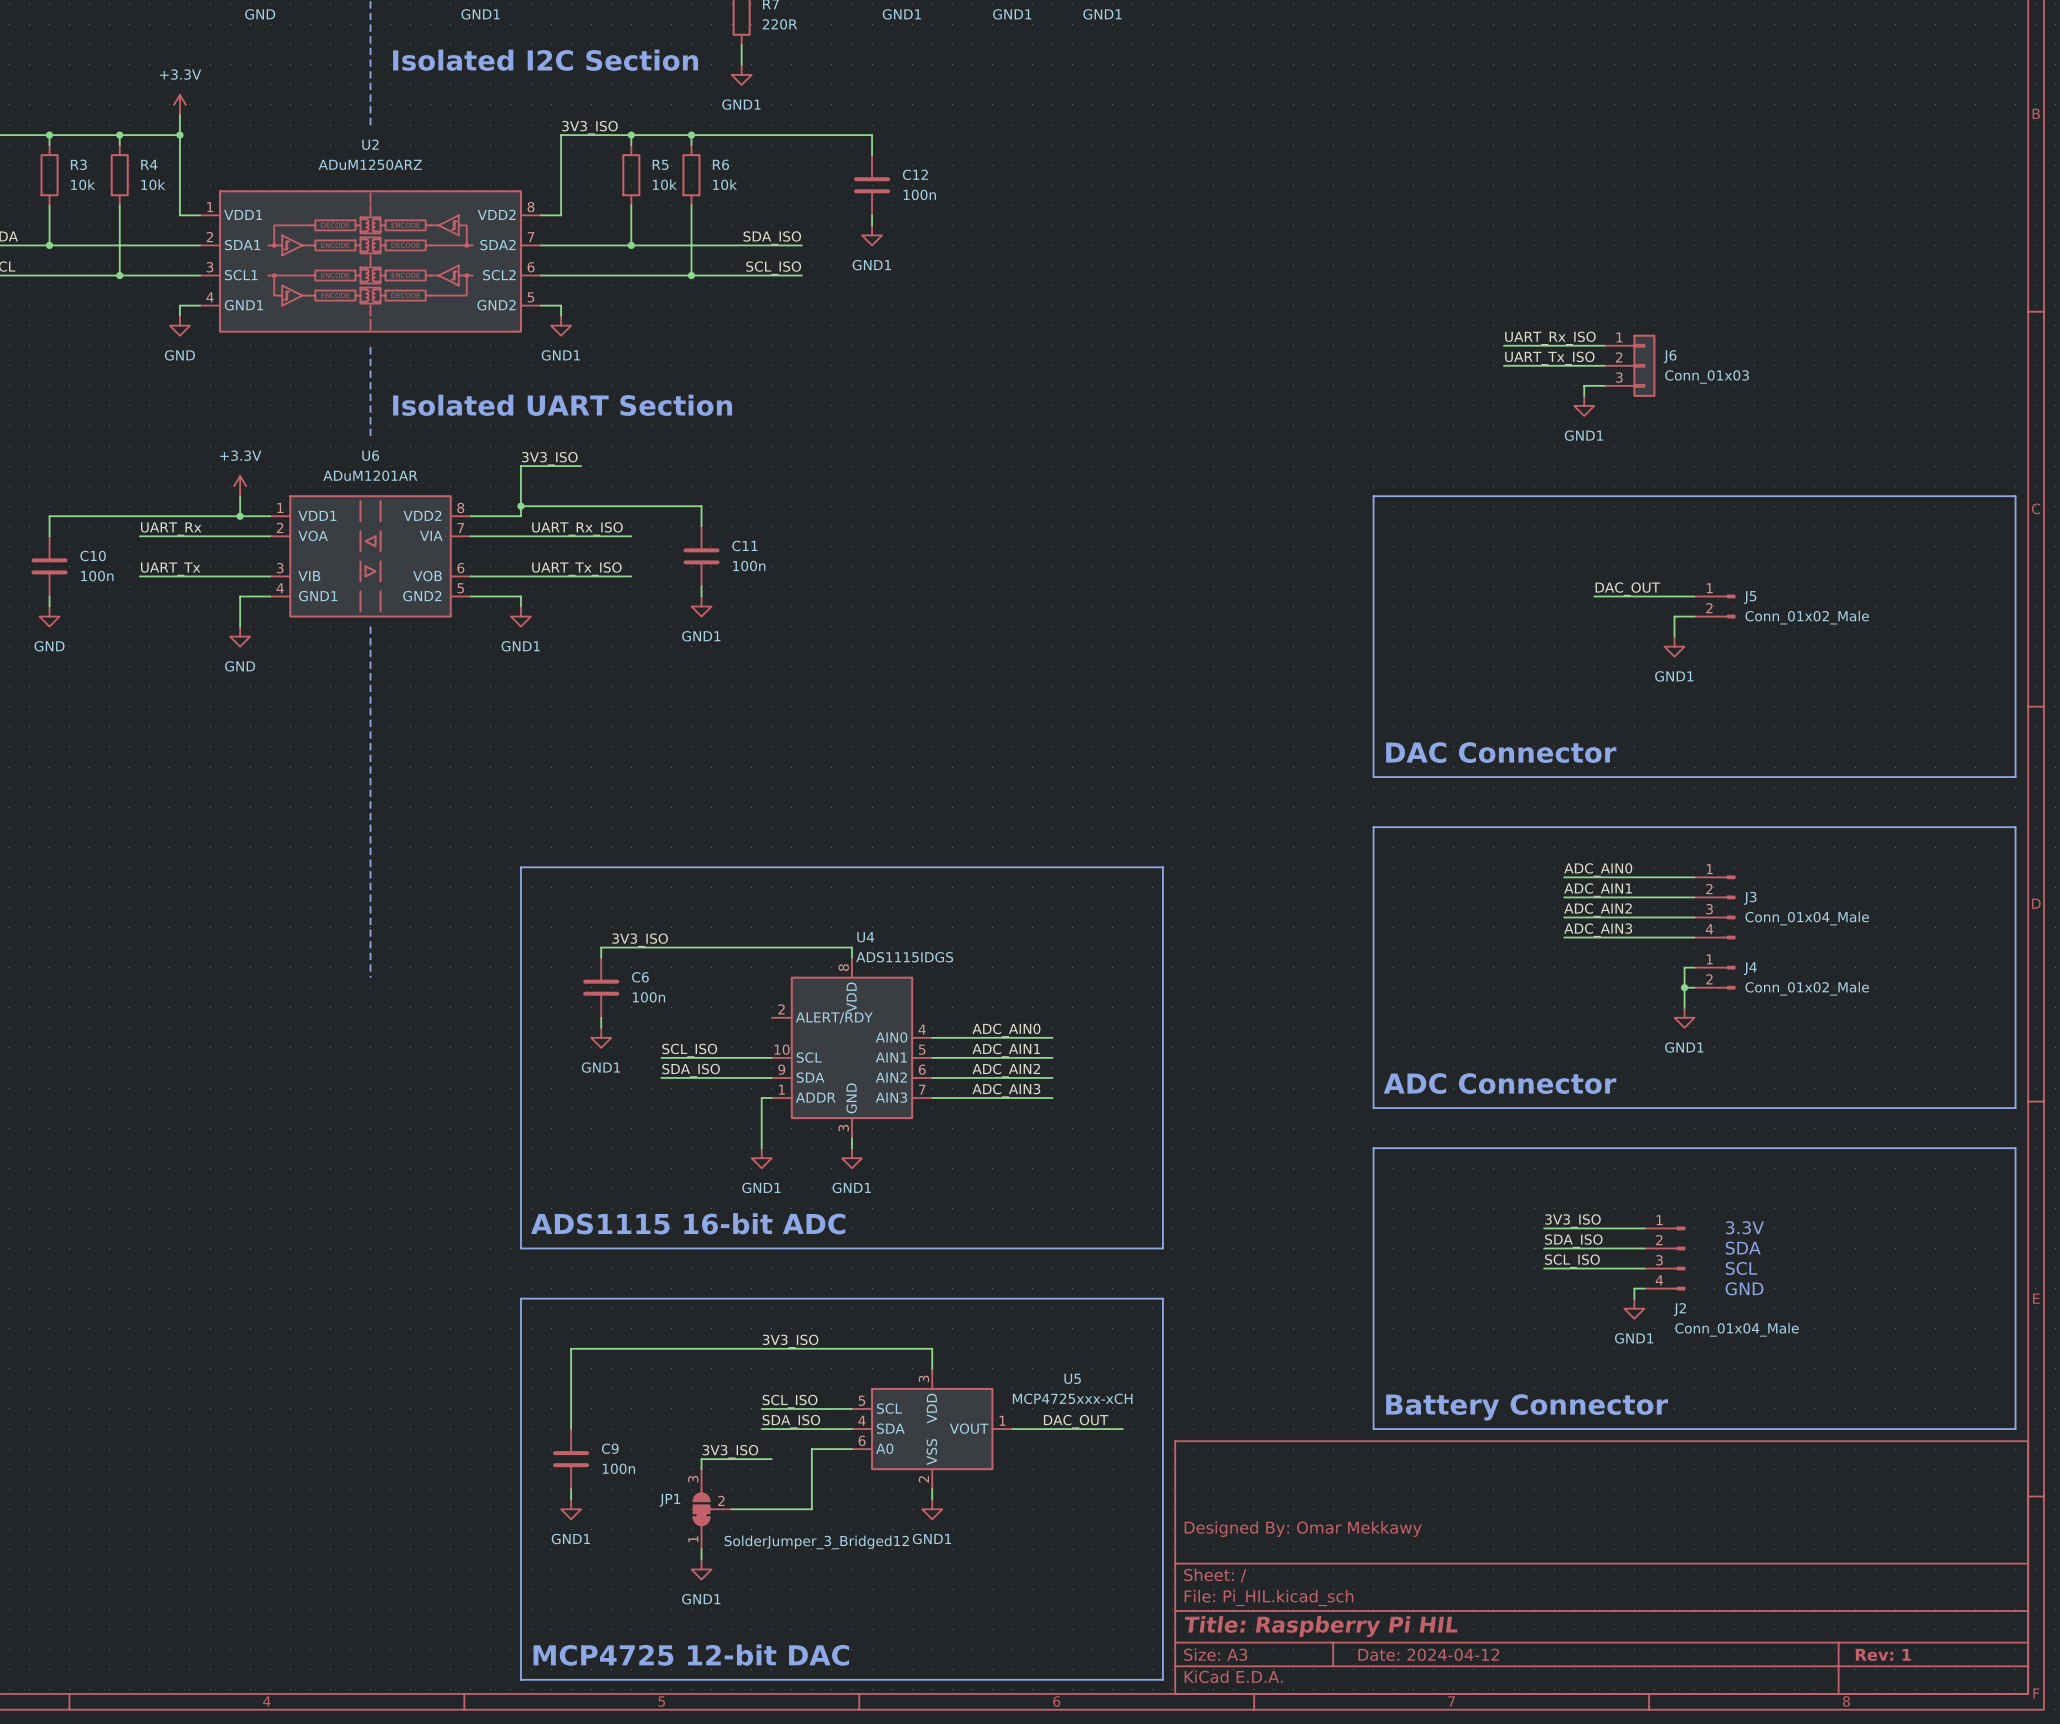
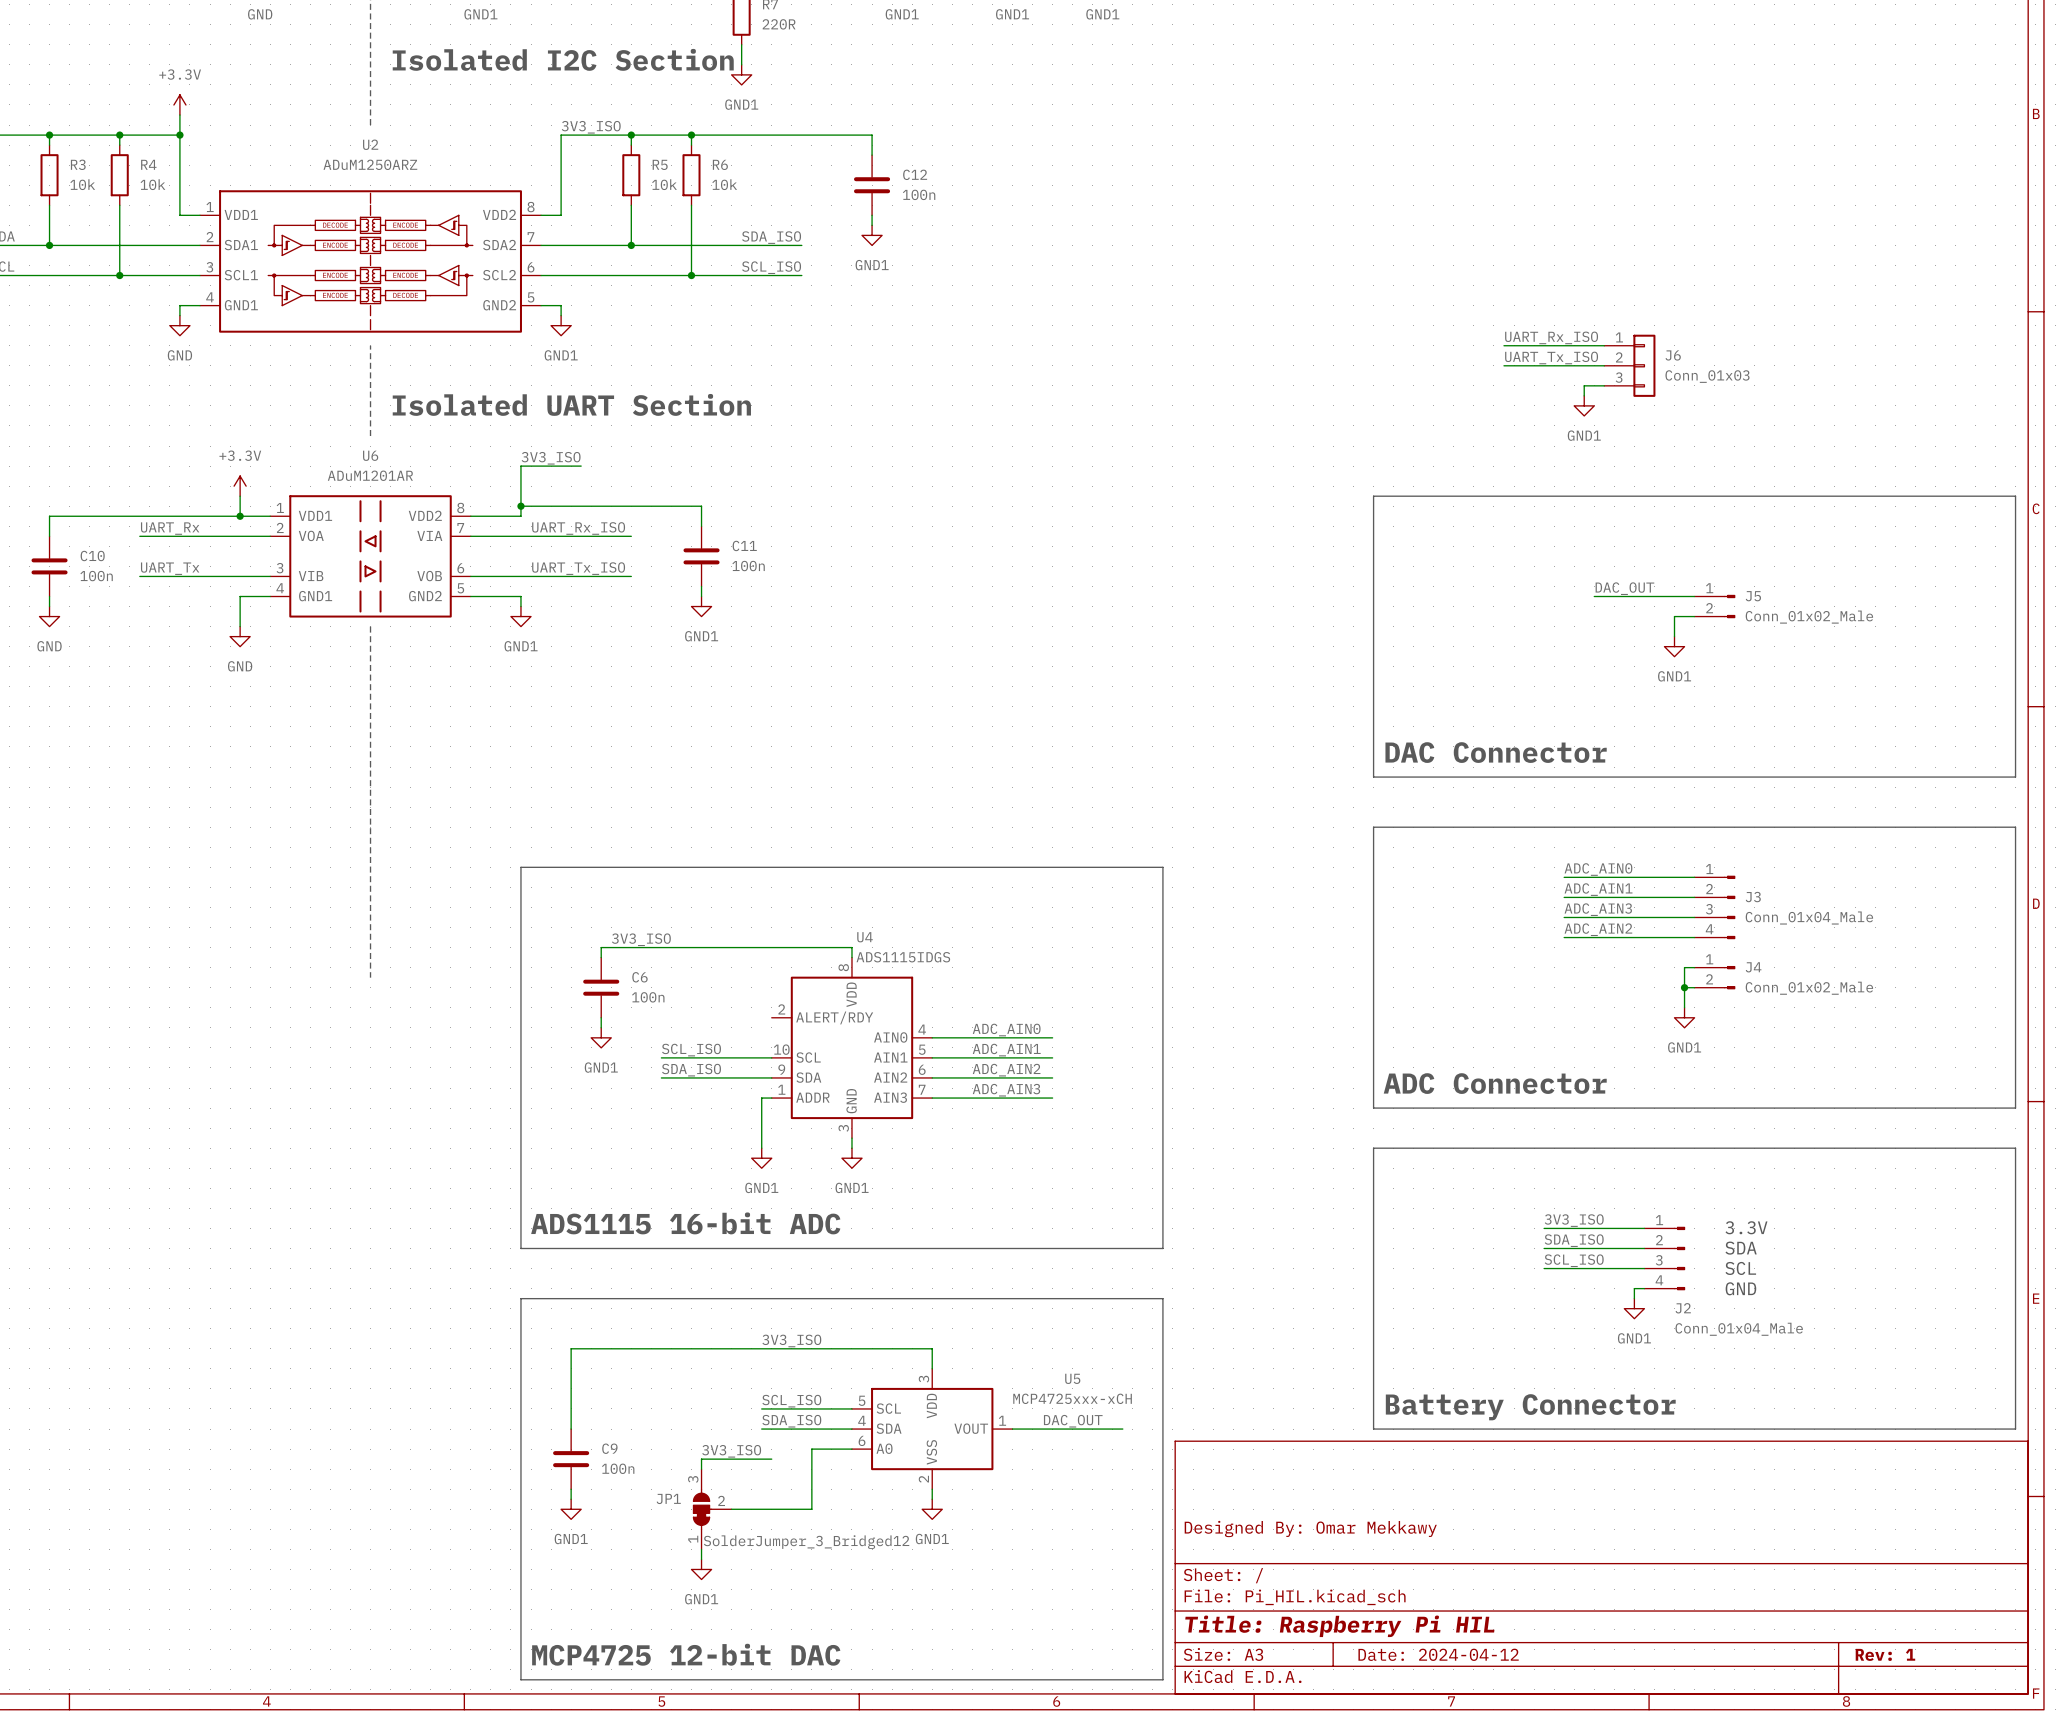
label: ADC_AIN2 (1598, 910) -> ADC_AIN3 (1598, 909)
label: ADC_AIN3 (1598, 930) -> ADC_AIN2 (1598, 929)

